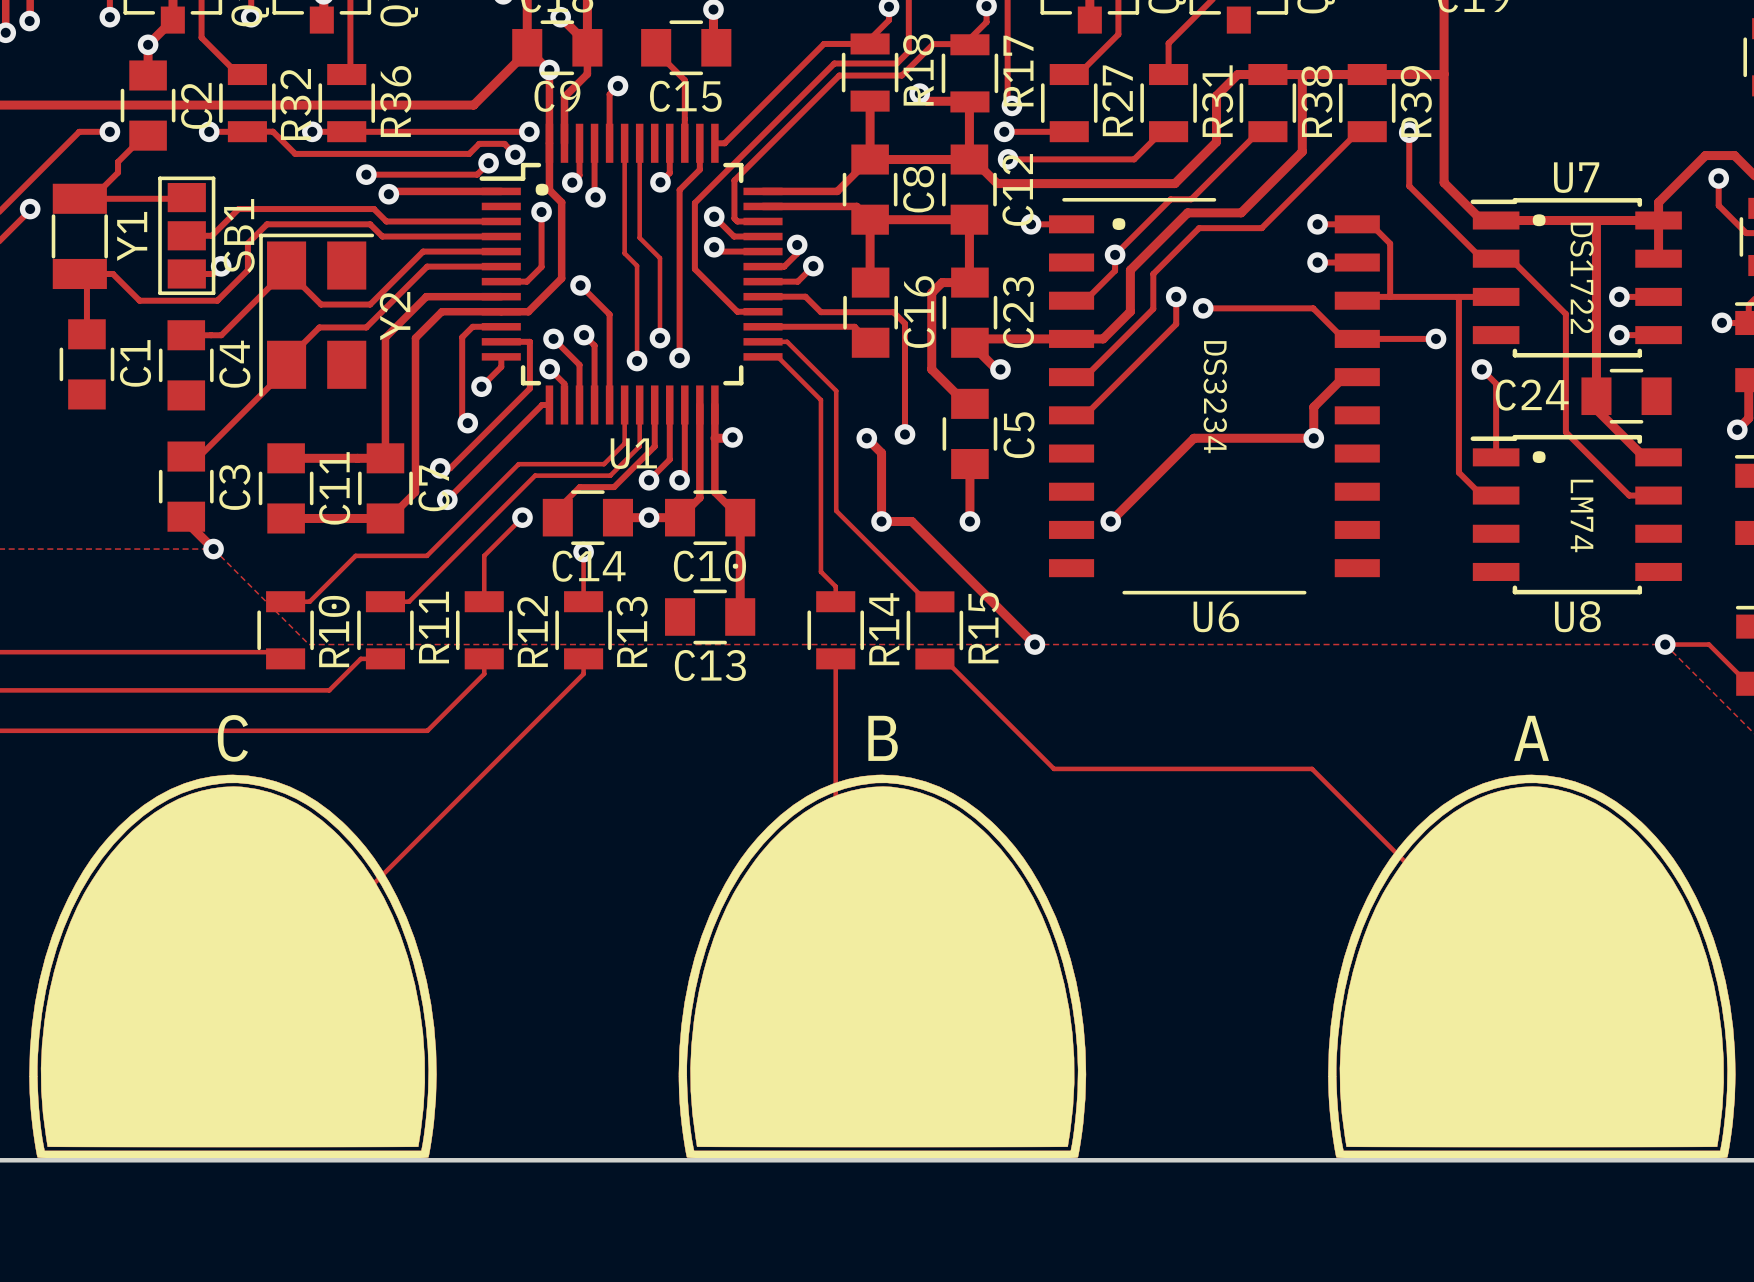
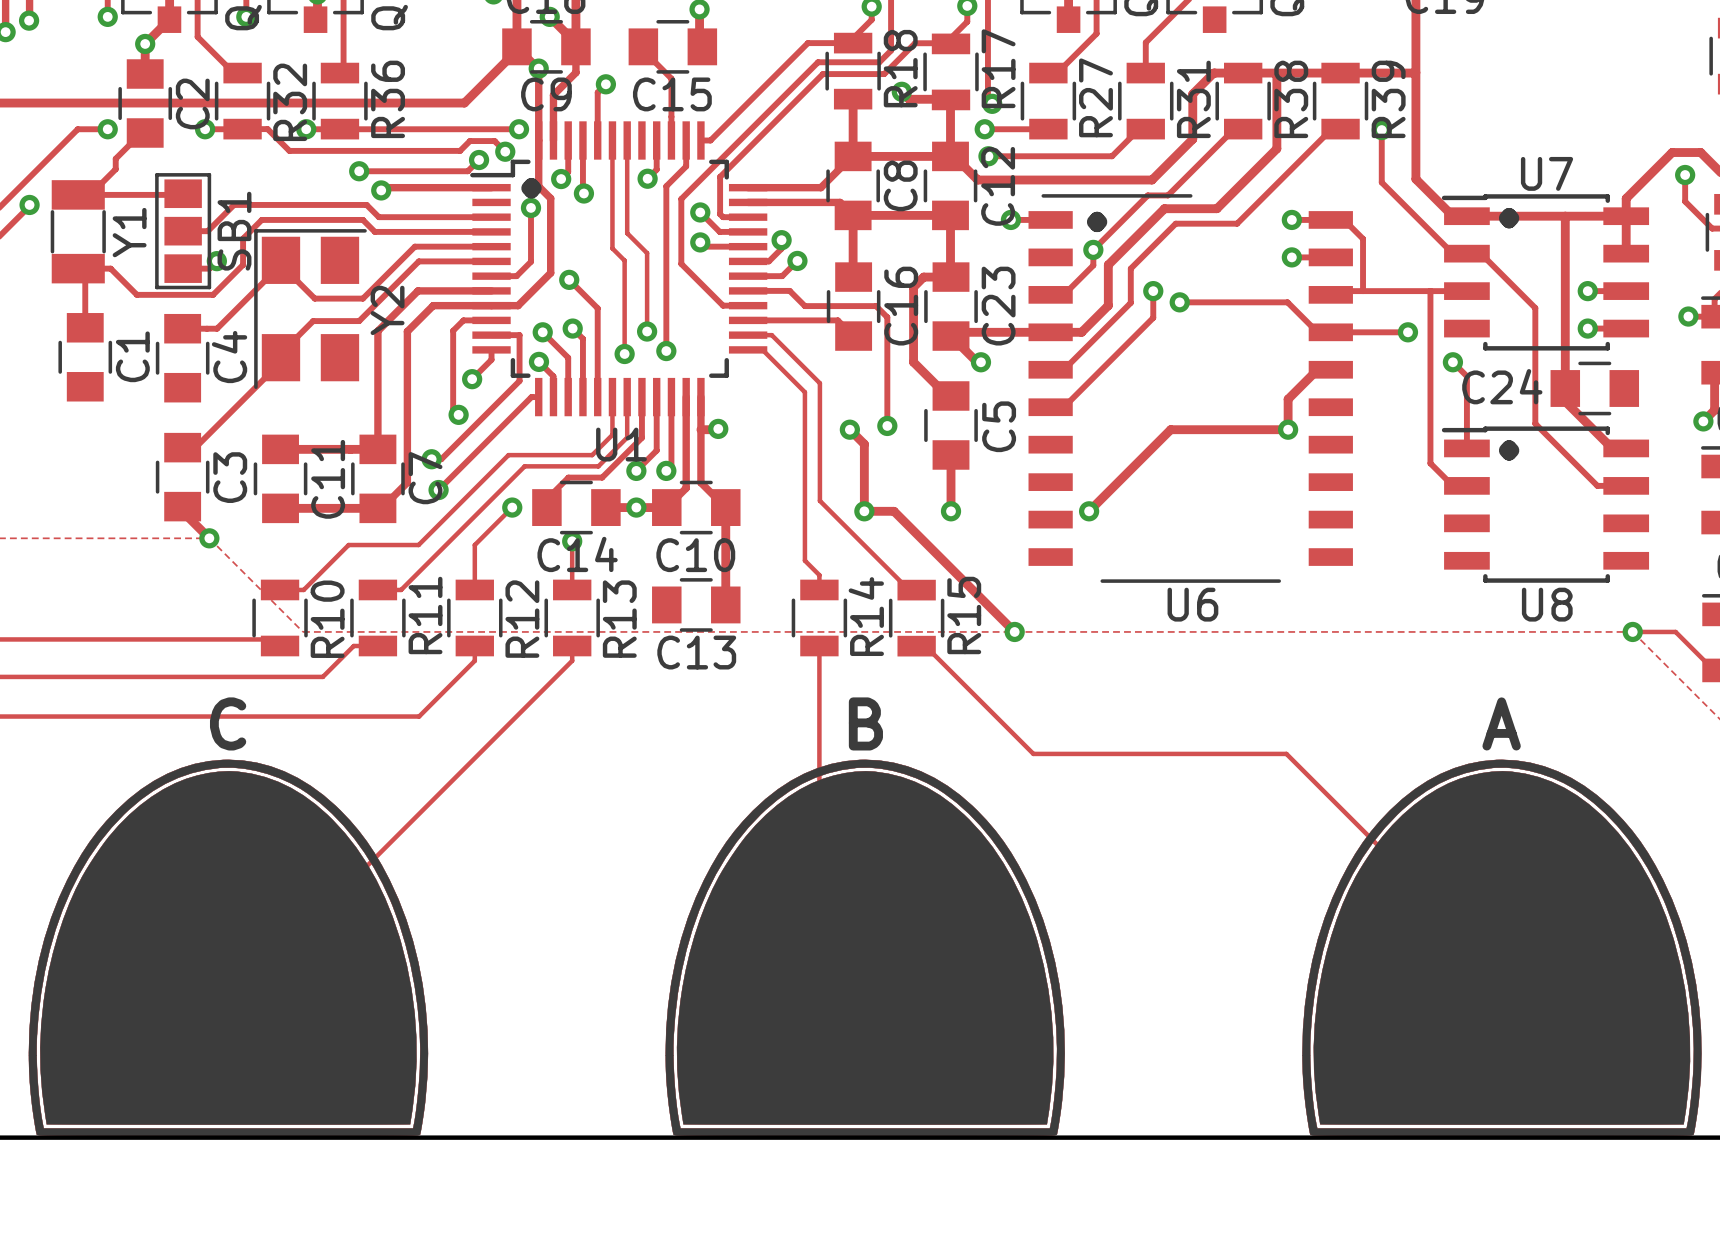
text: DS1722 (1582, 278) -> none
text: DS3234 (1215, 397) -> none
text: LM74 (1582, 515) -> none

